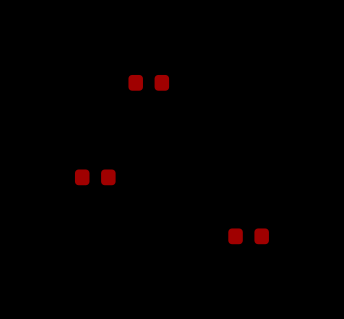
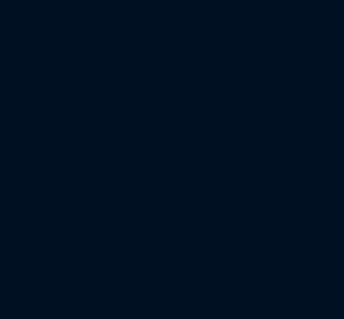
part: (148, 82) -> none
part: (95, 177) -> none
part: (248, 236) -> none

